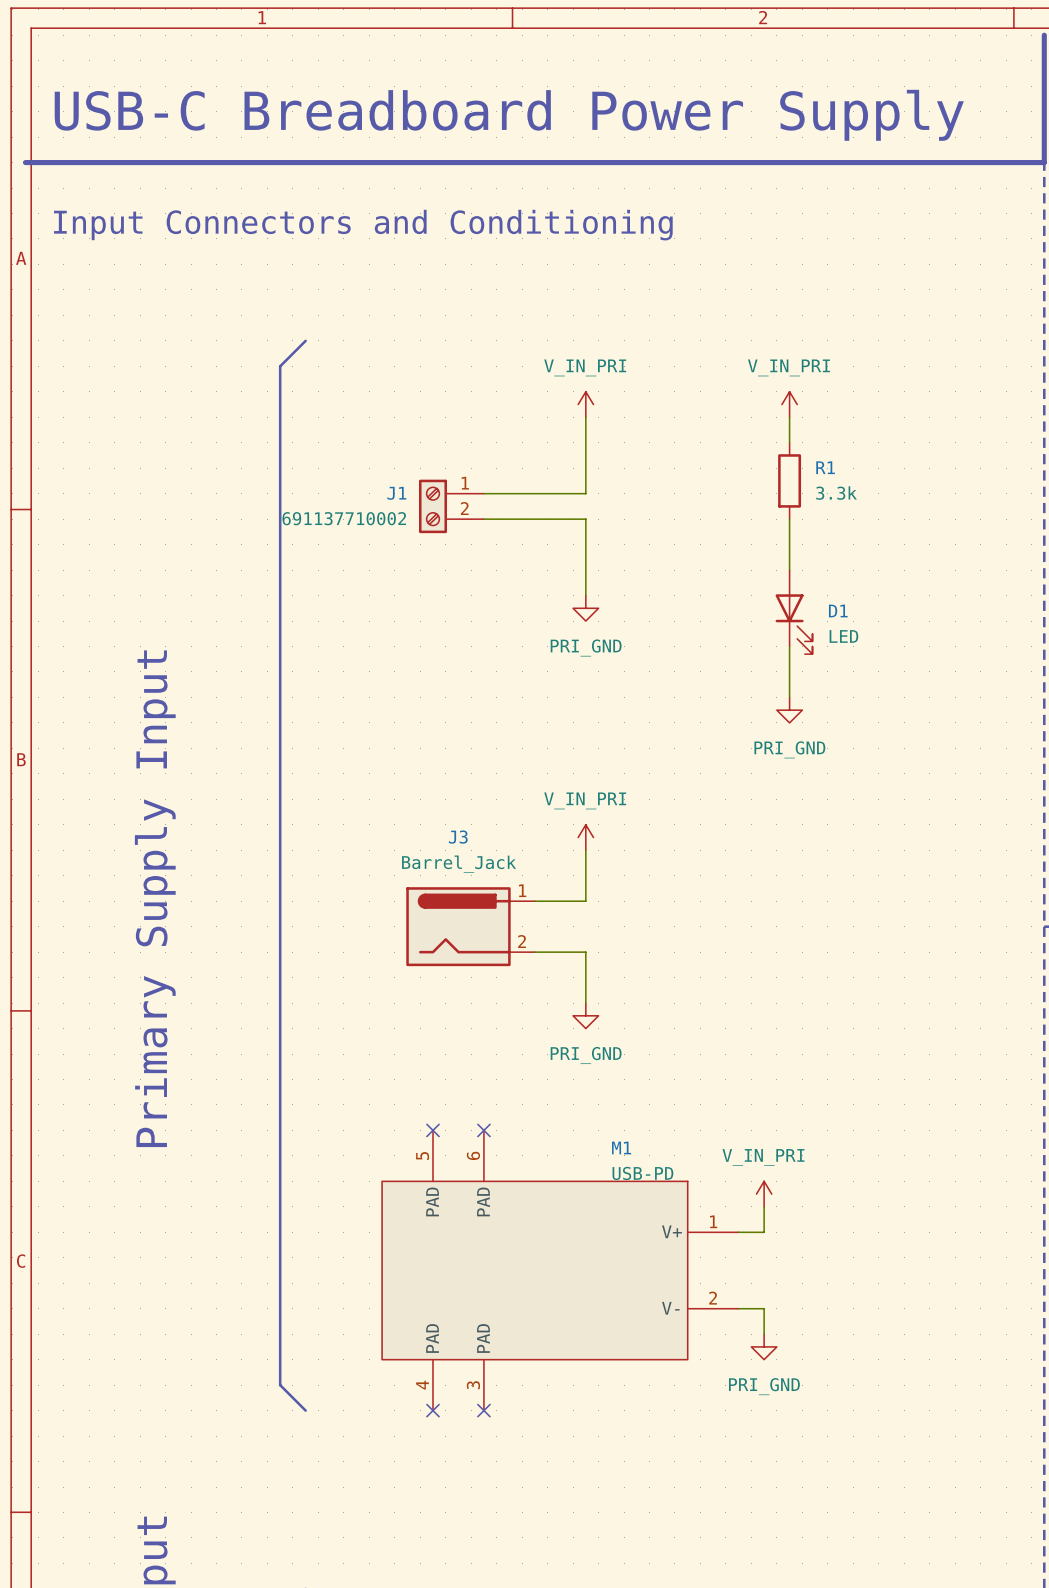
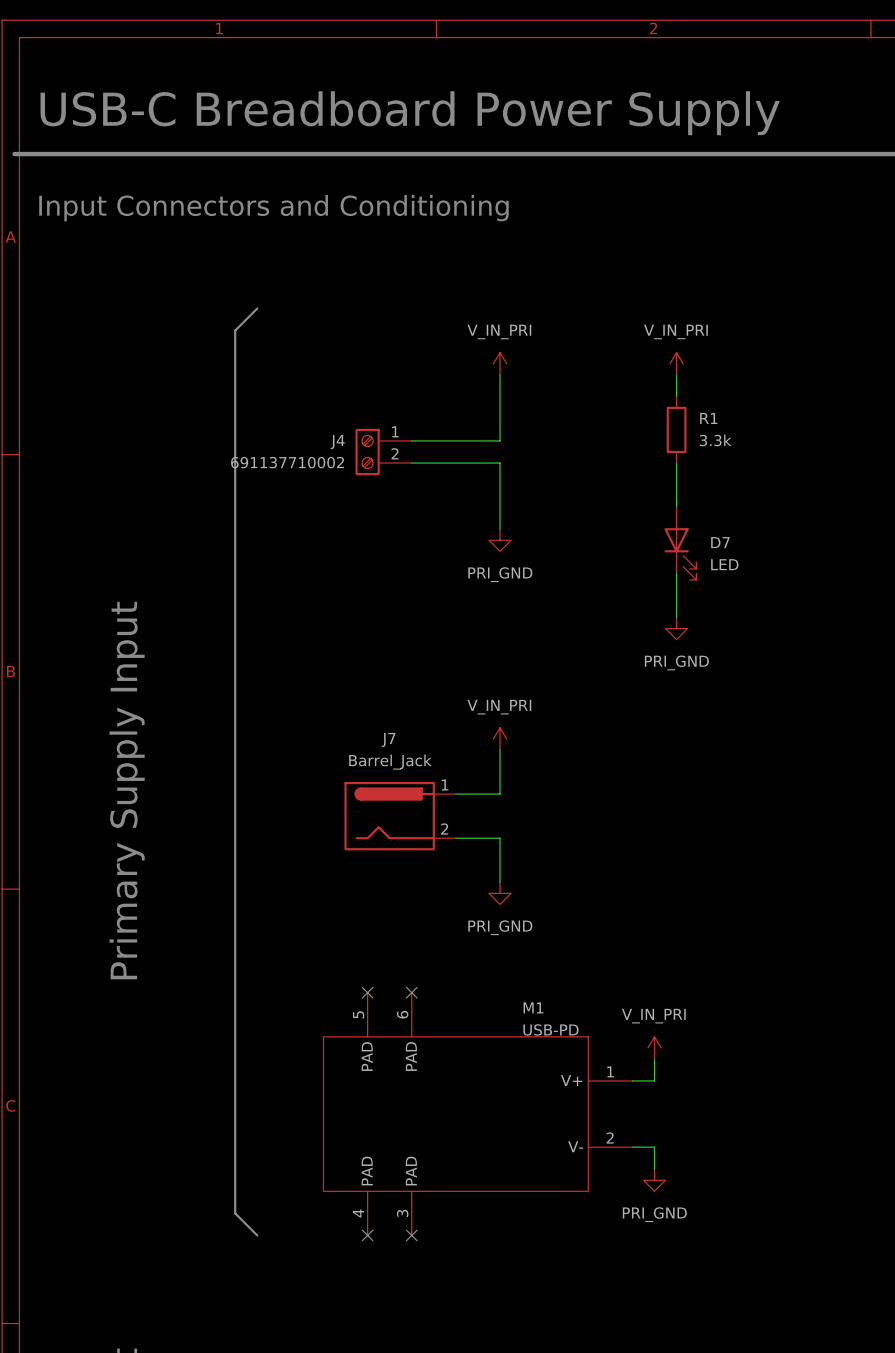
J1 name: J1 (396, 493) -> J4 (337, 442)
D1 name: D1 (838, 611) -> D7 (720, 542)
J3 name: J3 (458, 837) -> J7 (388, 739)

